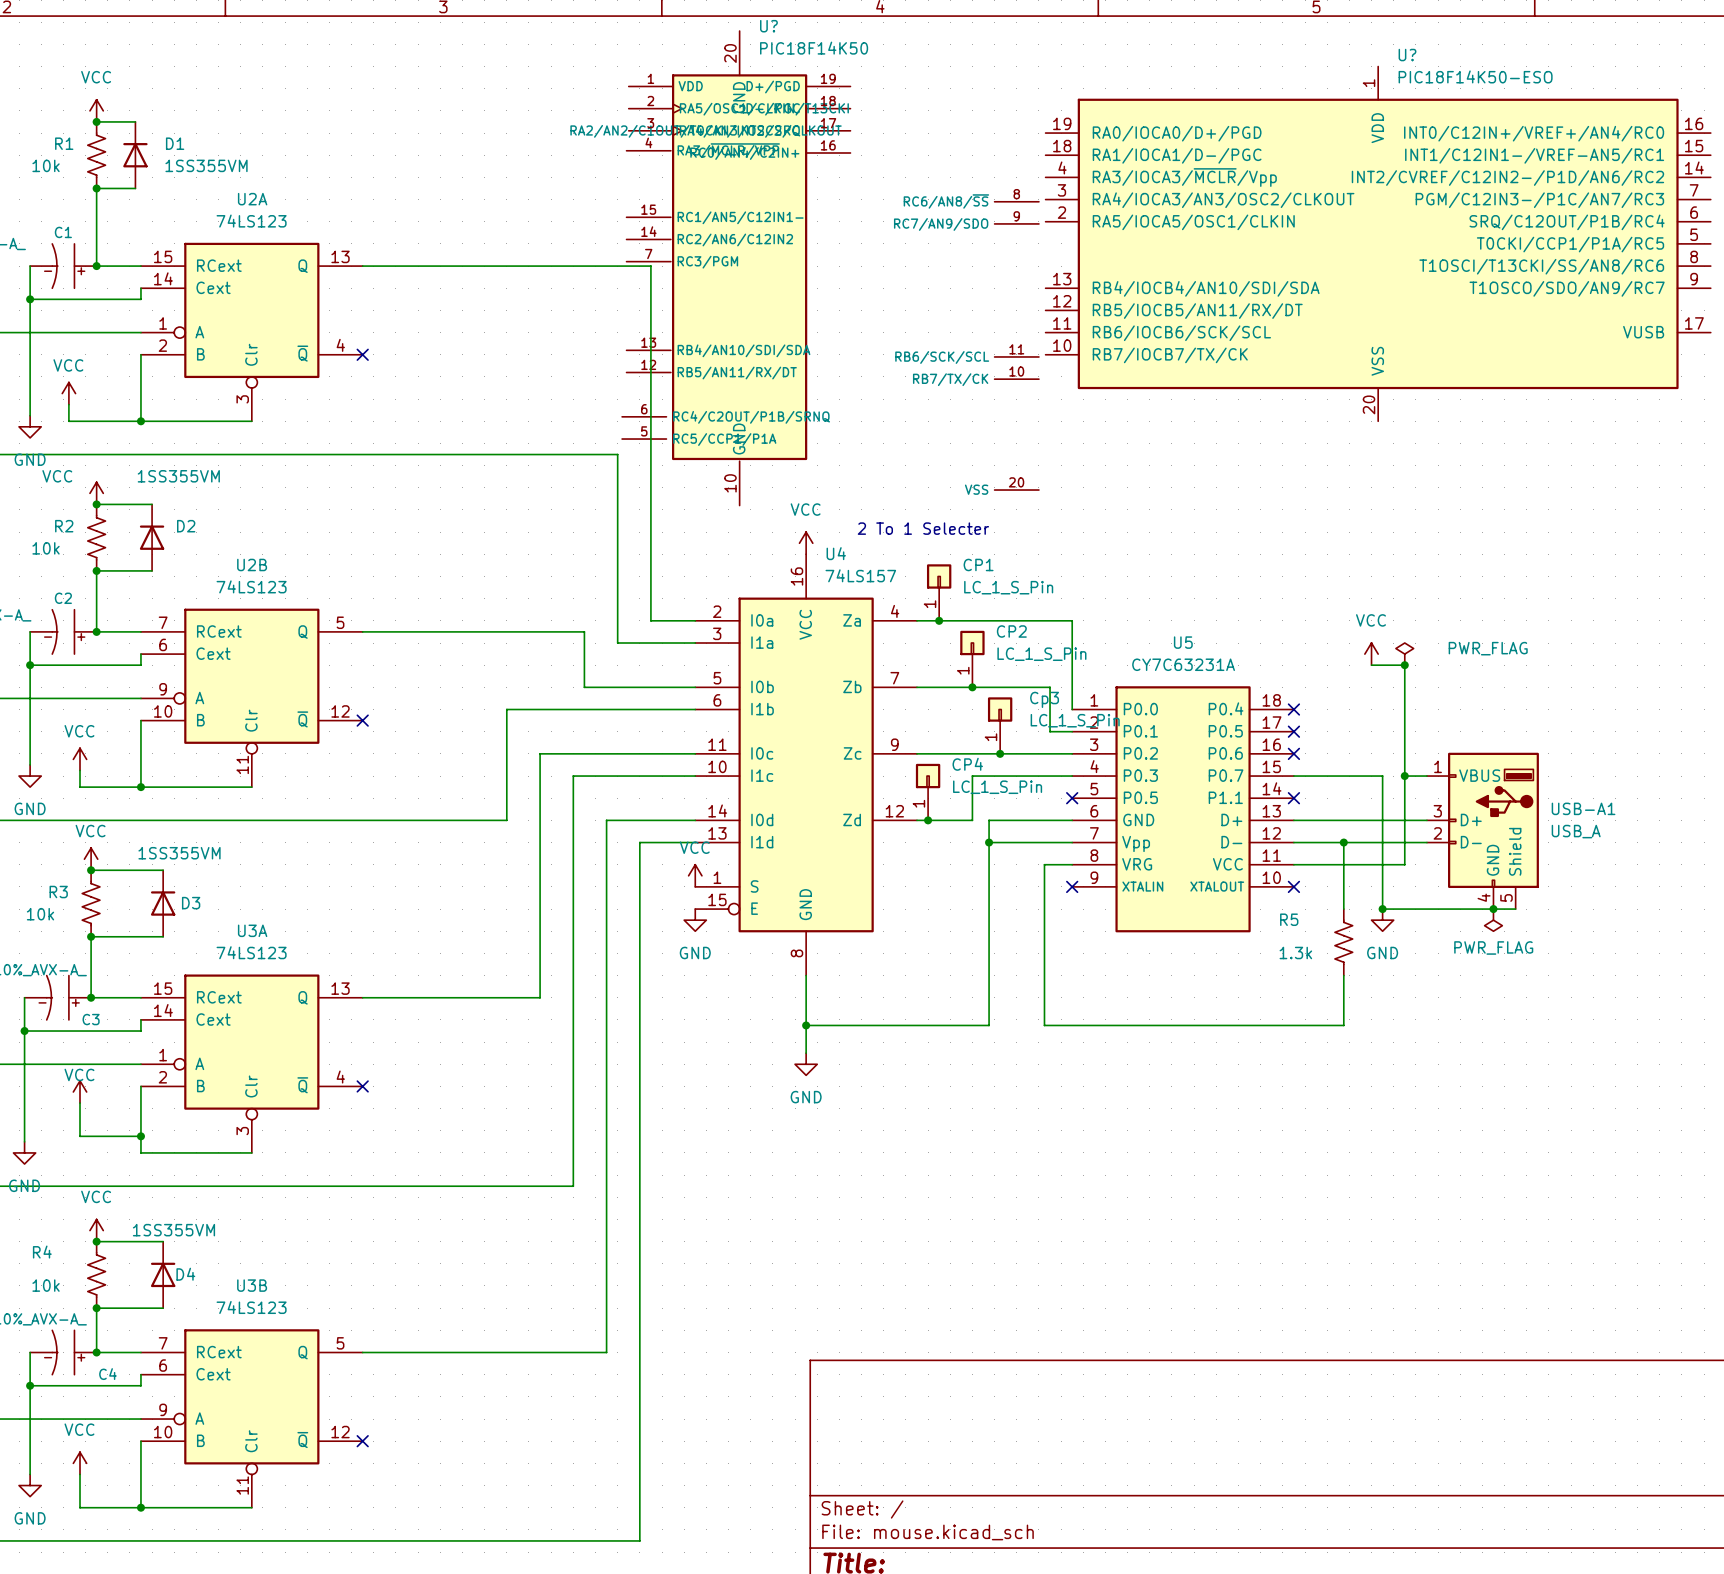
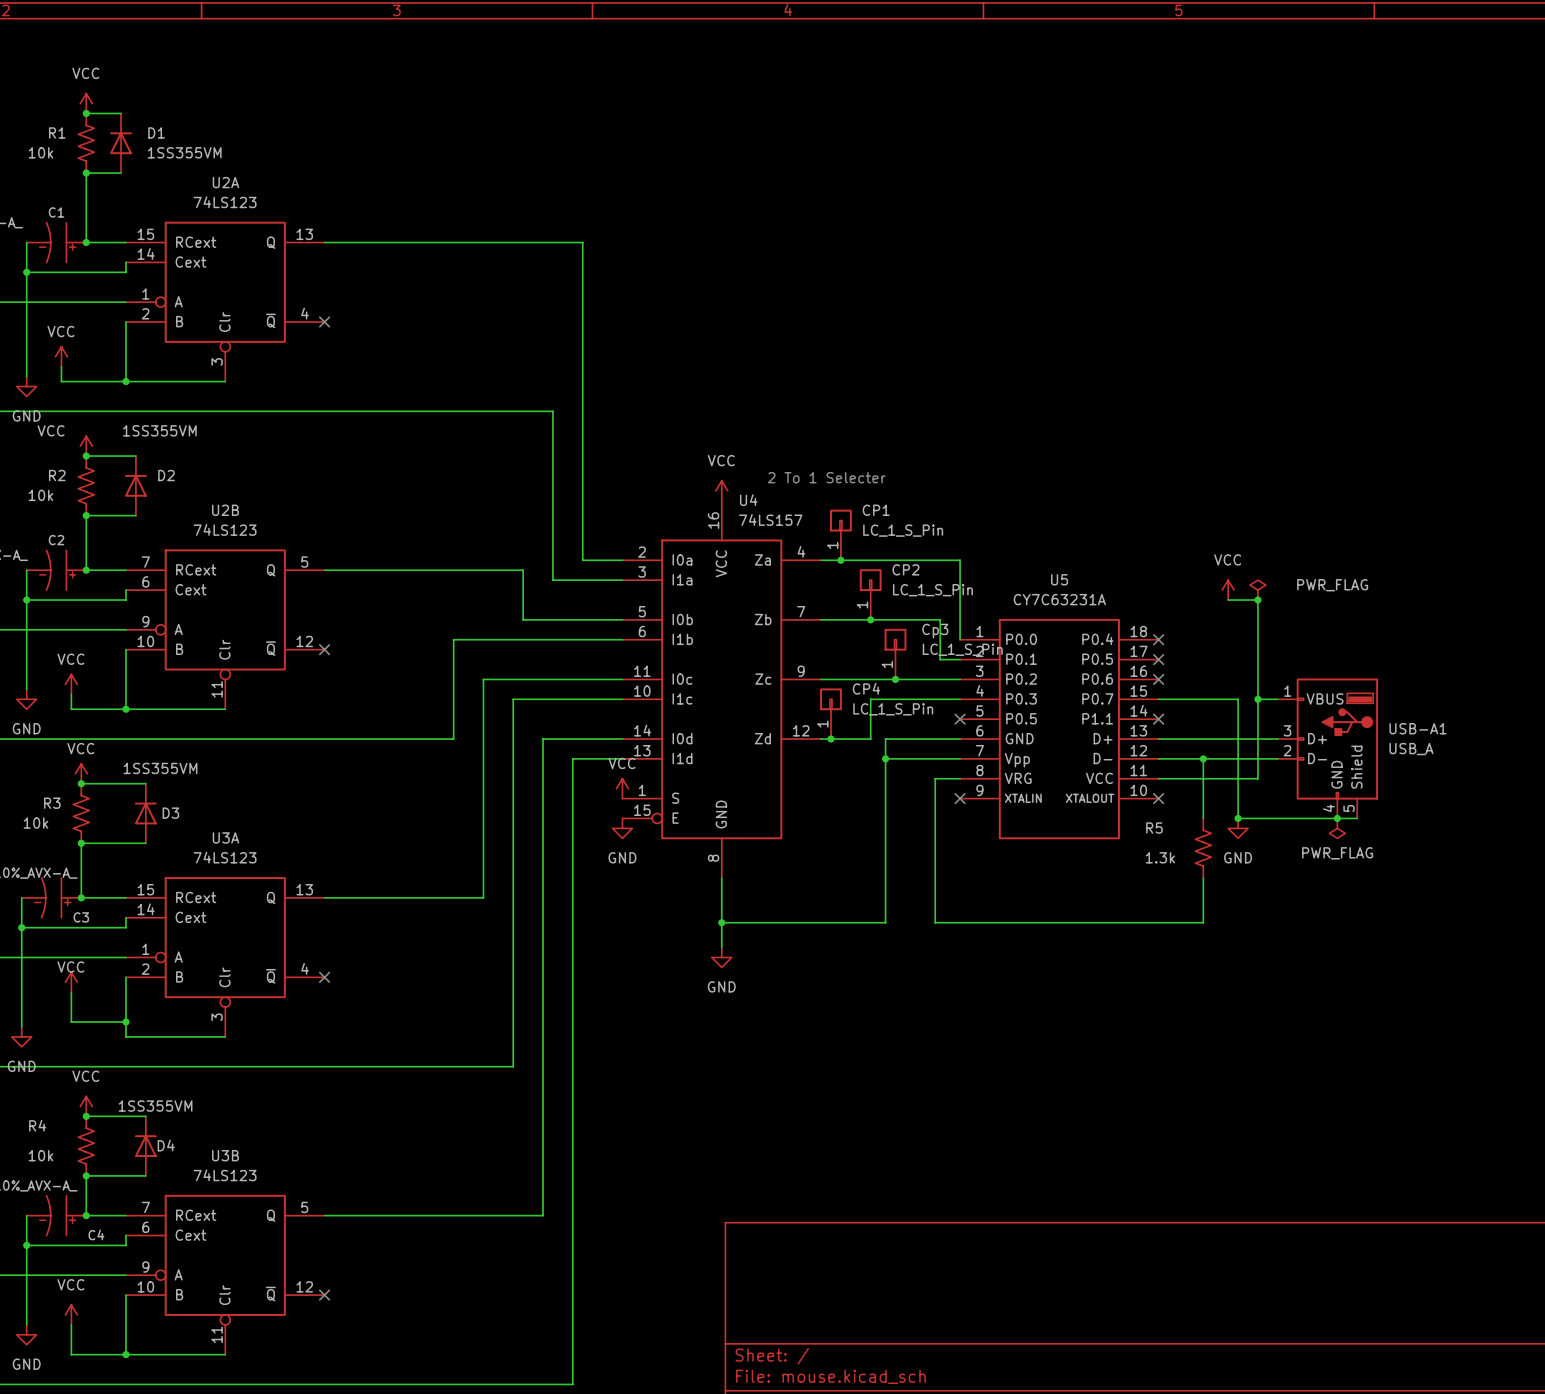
U?: PIC18F14K50-ESO (1378, 243) -> none
U?: PIC18F14K50 (830, 268) -> none

